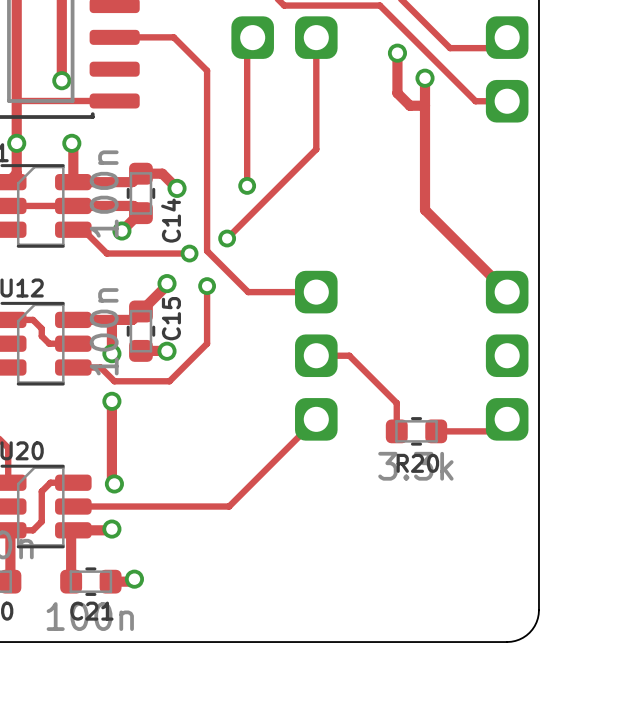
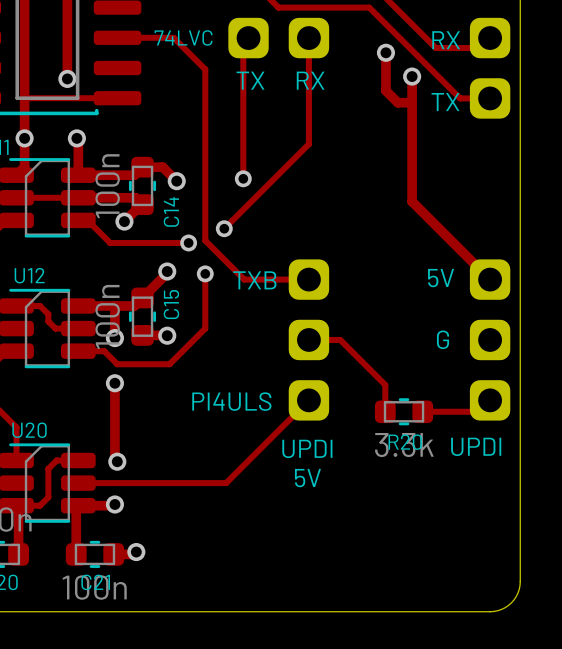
text: none -> 74LVC (183, 37)
text: none -> RX (446, 40)
text: none -> TX (250, 80)
text: none -> RX (310, 80)
text: none -> TX (445, 102)
text: none -> 5V (441, 278)
text: none -> TXB (254, 280)
text: none -> G (443, 339)
text: none -> PI4ULS (231, 401)
text: none -> UPDI (476, 446)
text: none -> UPDI (307, 448)
text: none -> 5V (307, 478)

